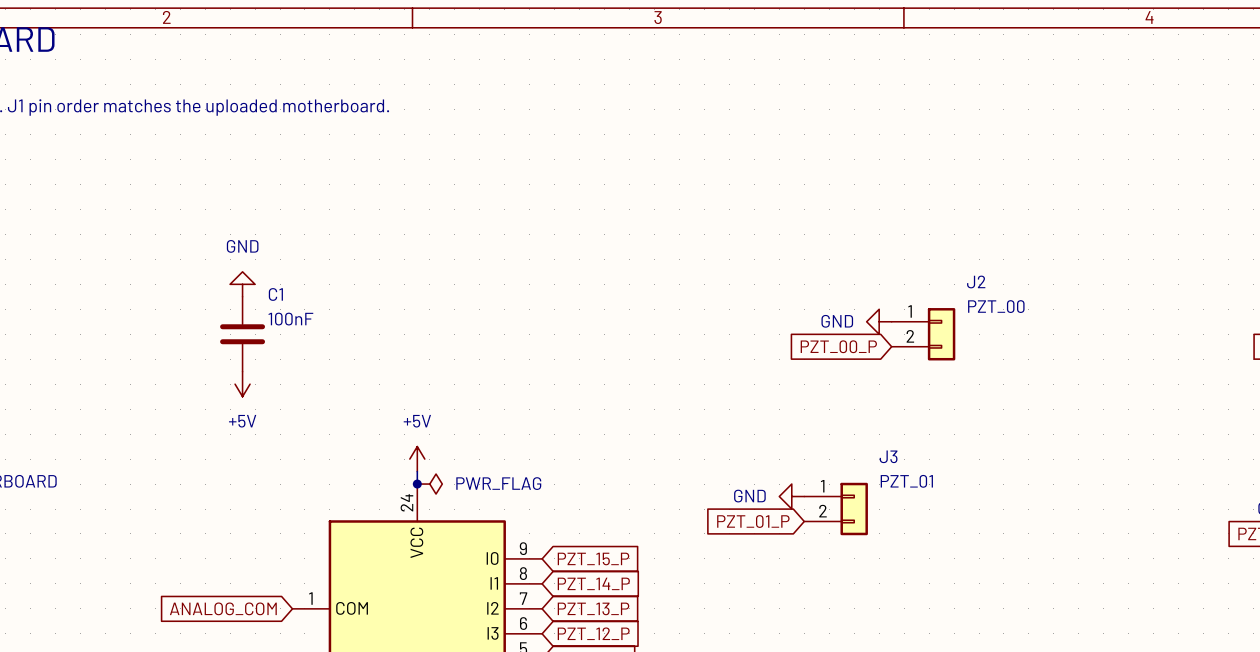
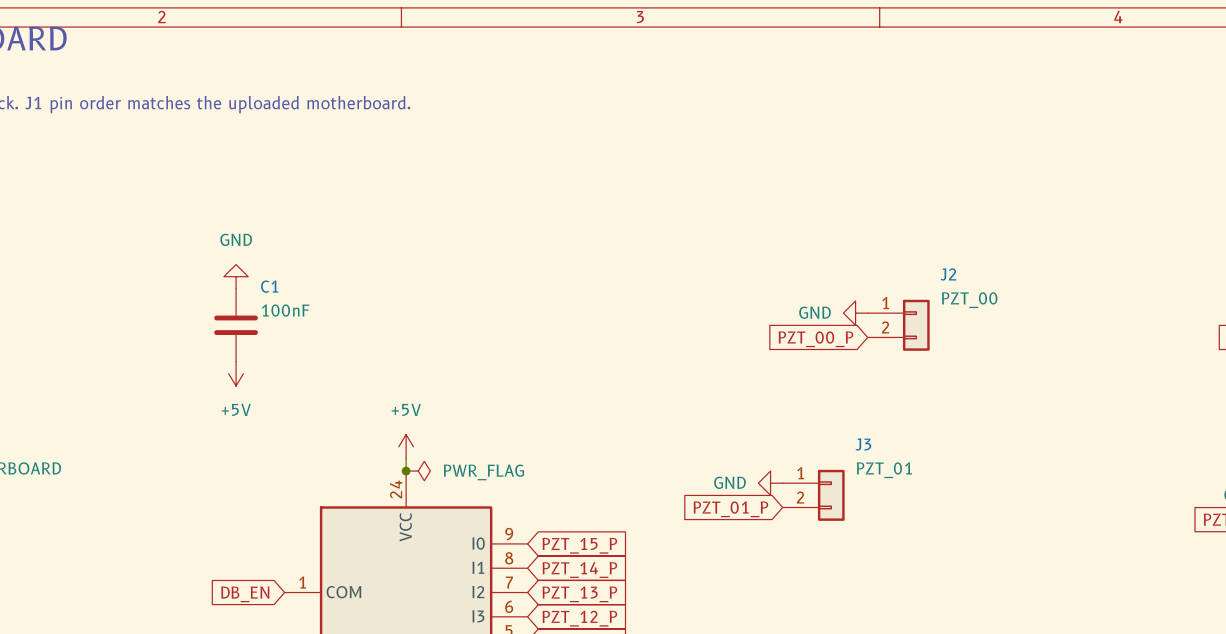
global label: ANALOG_COM (223, 608) -> DB_EN (245, 594)

